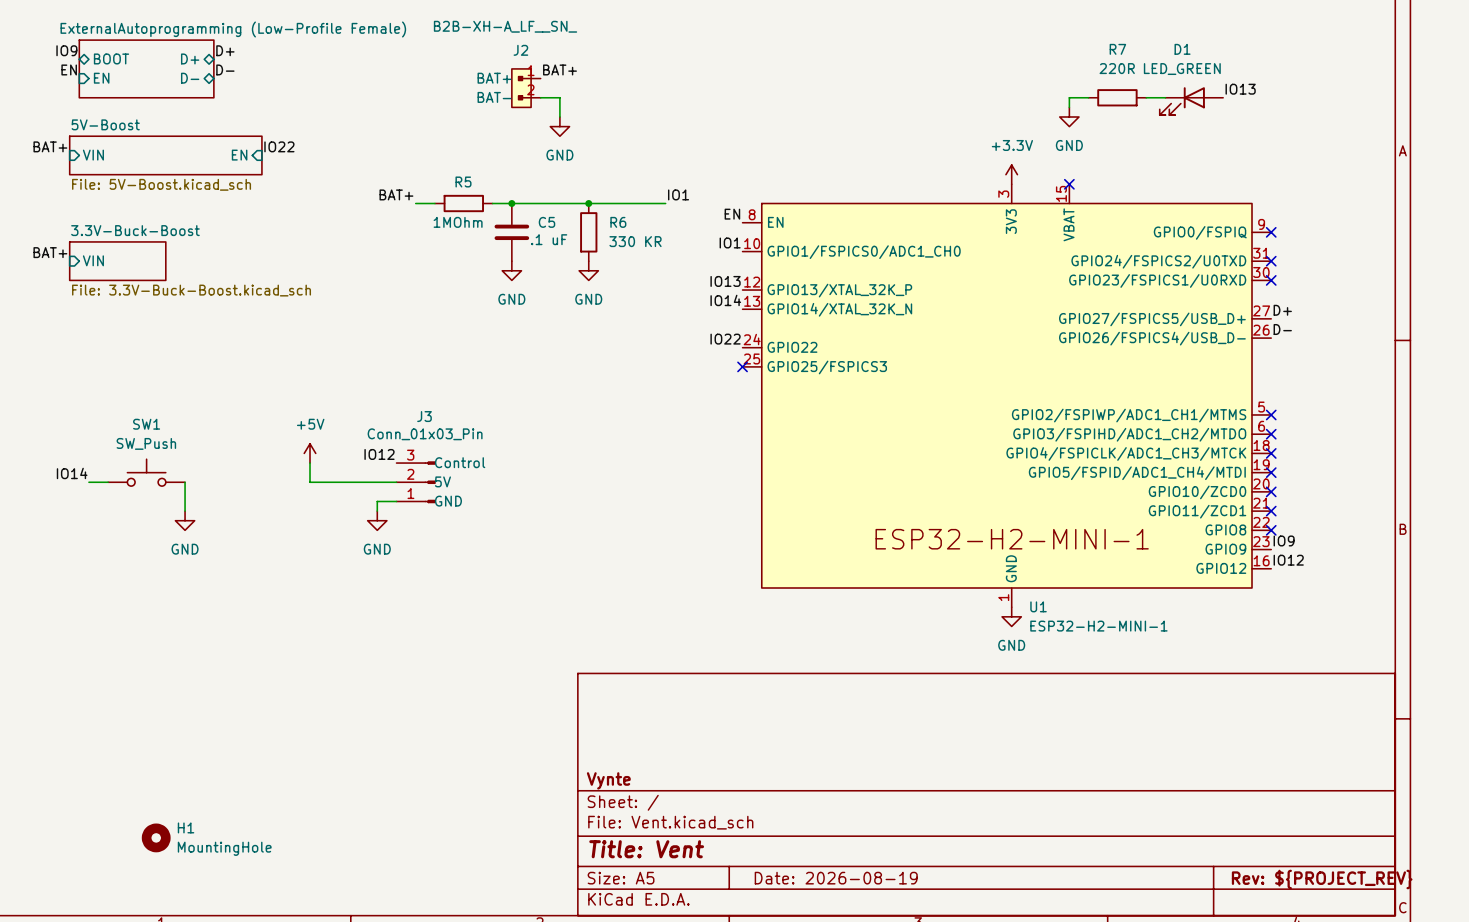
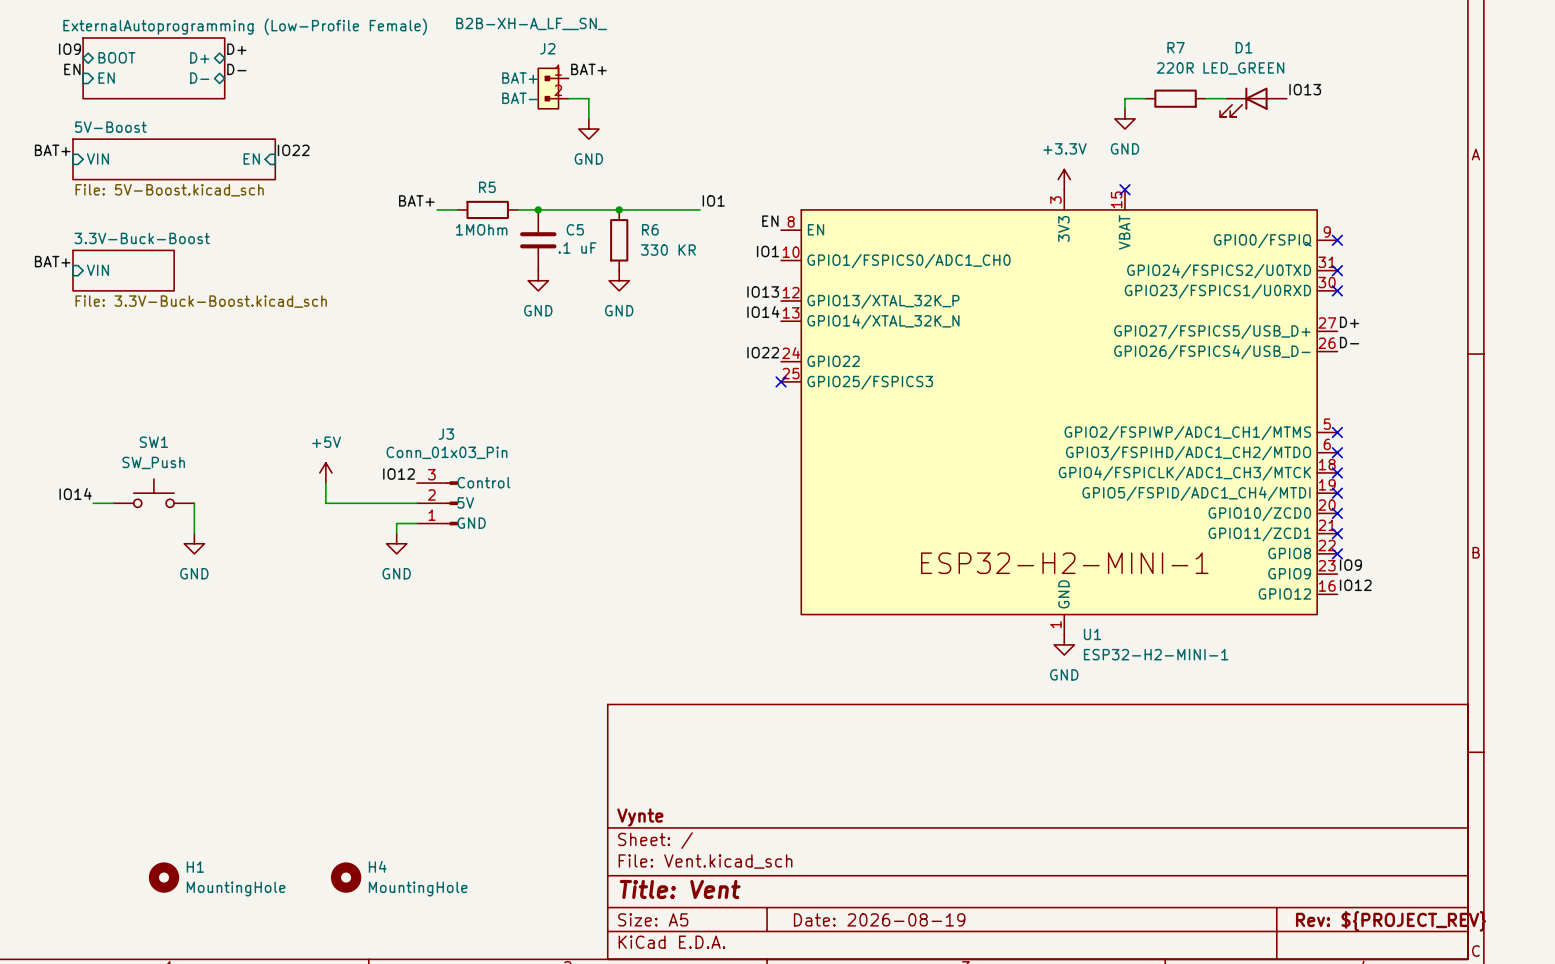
H4: none -> MountingHole (346, 877)

